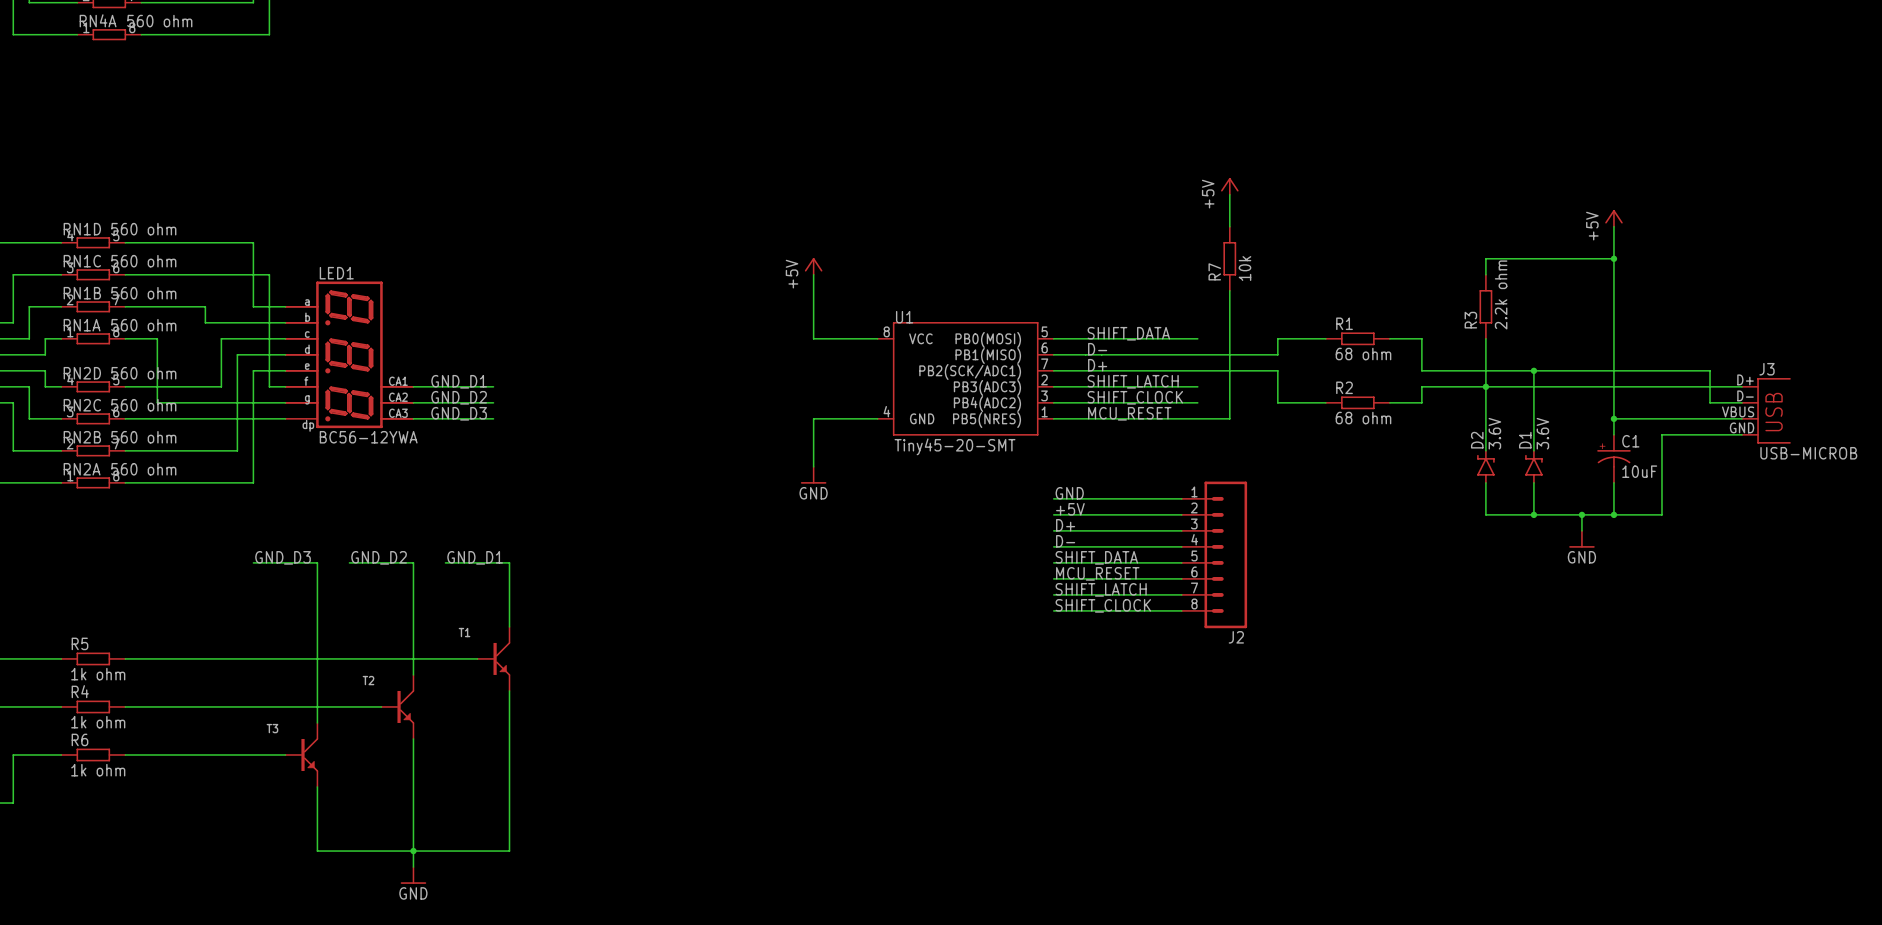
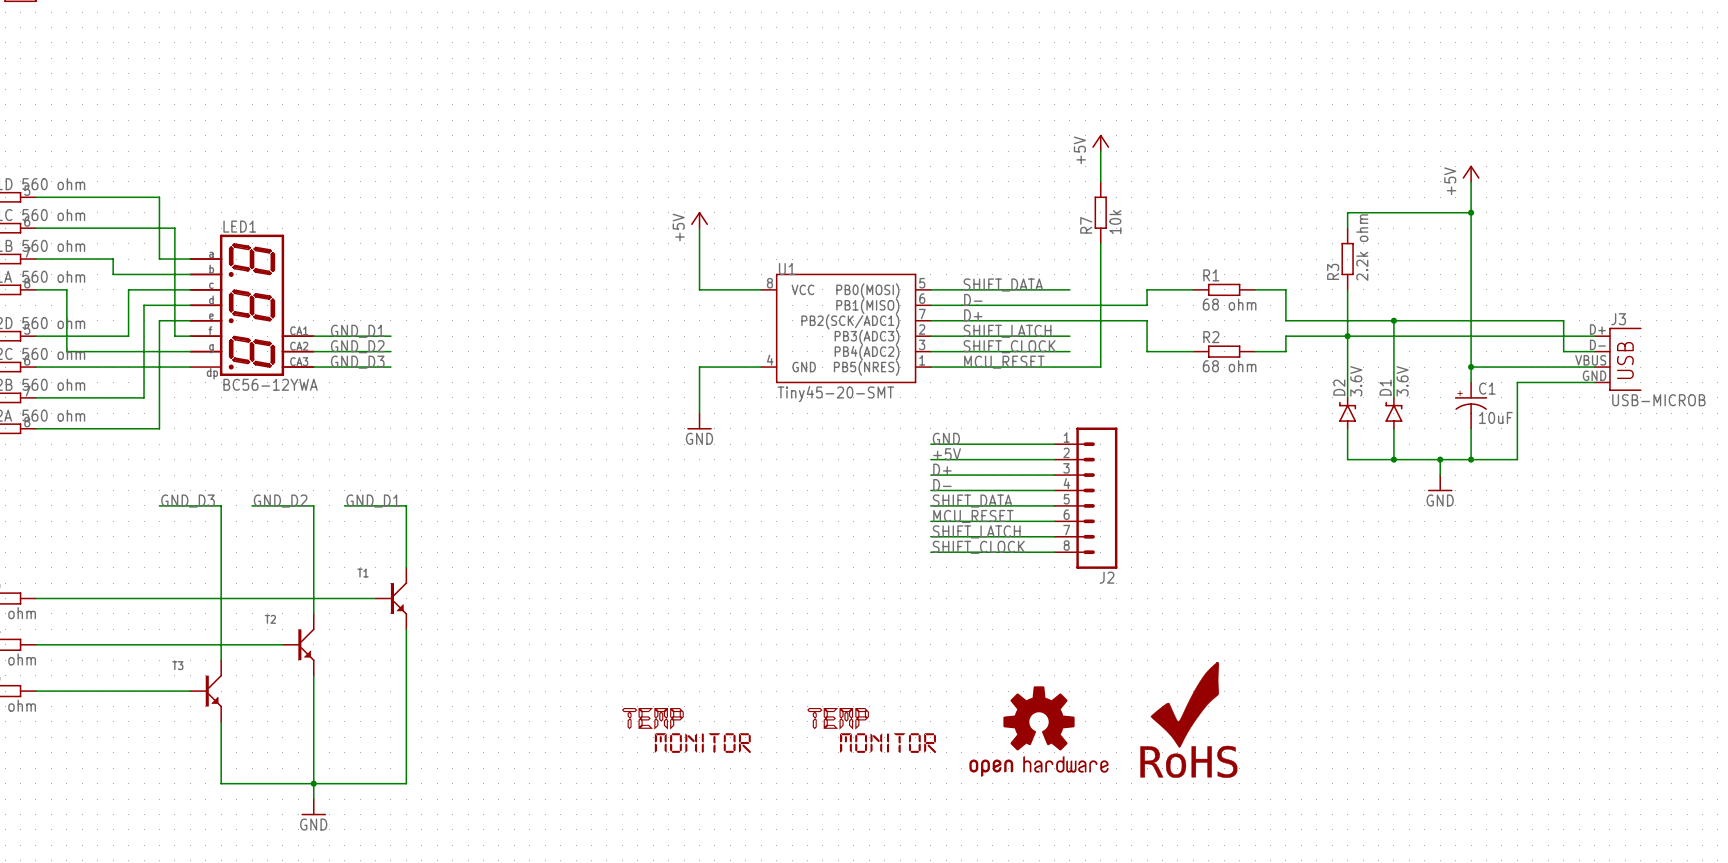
part: none -> (1188, 719)
part: none -> (686, 730)
part: none -> (871, 730)
part: none -> (1038, 731)

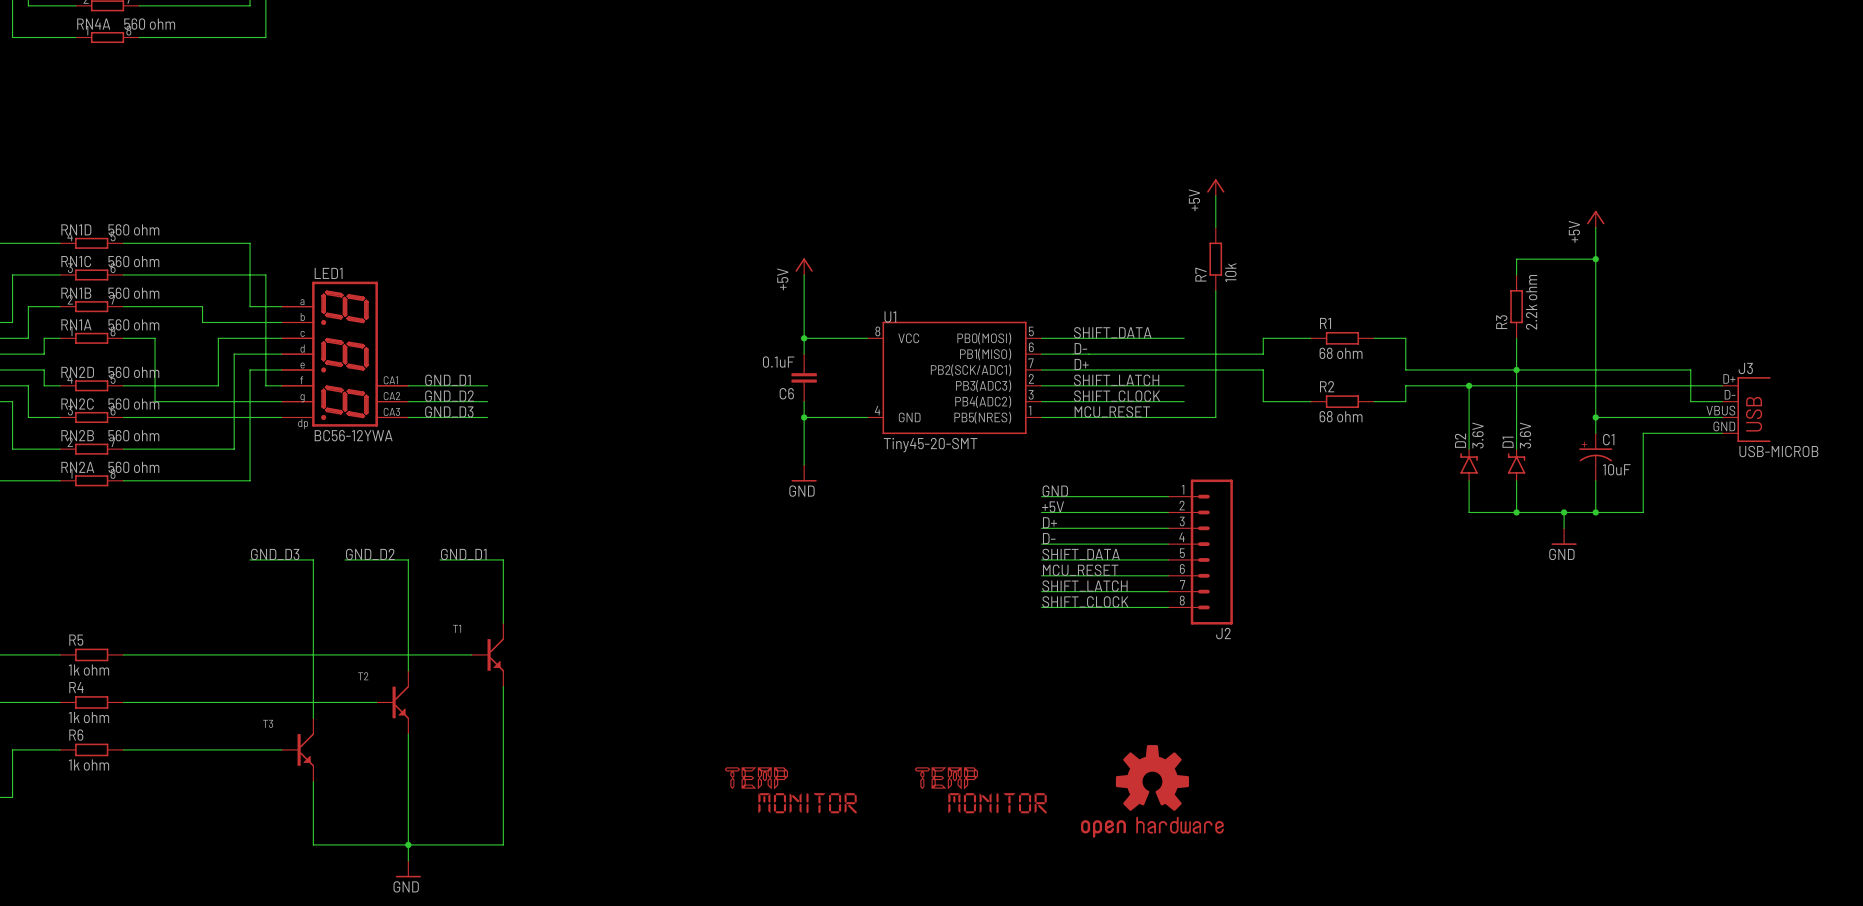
wire: (1393, 212) (1347, 212) (1347, 228) -> (1516, 259) (1516, 274)
R3 position: (1347, 259) -> (1516, 306)
wire: none -> (804, 338) (804, 354)
junction: none -> (804, 338)
wire: (1347, 289) (1347, 336) -> none
wire: none -> (1516, 338) (1516, 369)
C6: none -> 0.1uF (804, 377)
wire: none -> (804, 401) (804, 417)
junction: none -> (804, 417)
part: (1188, 719) -> none

